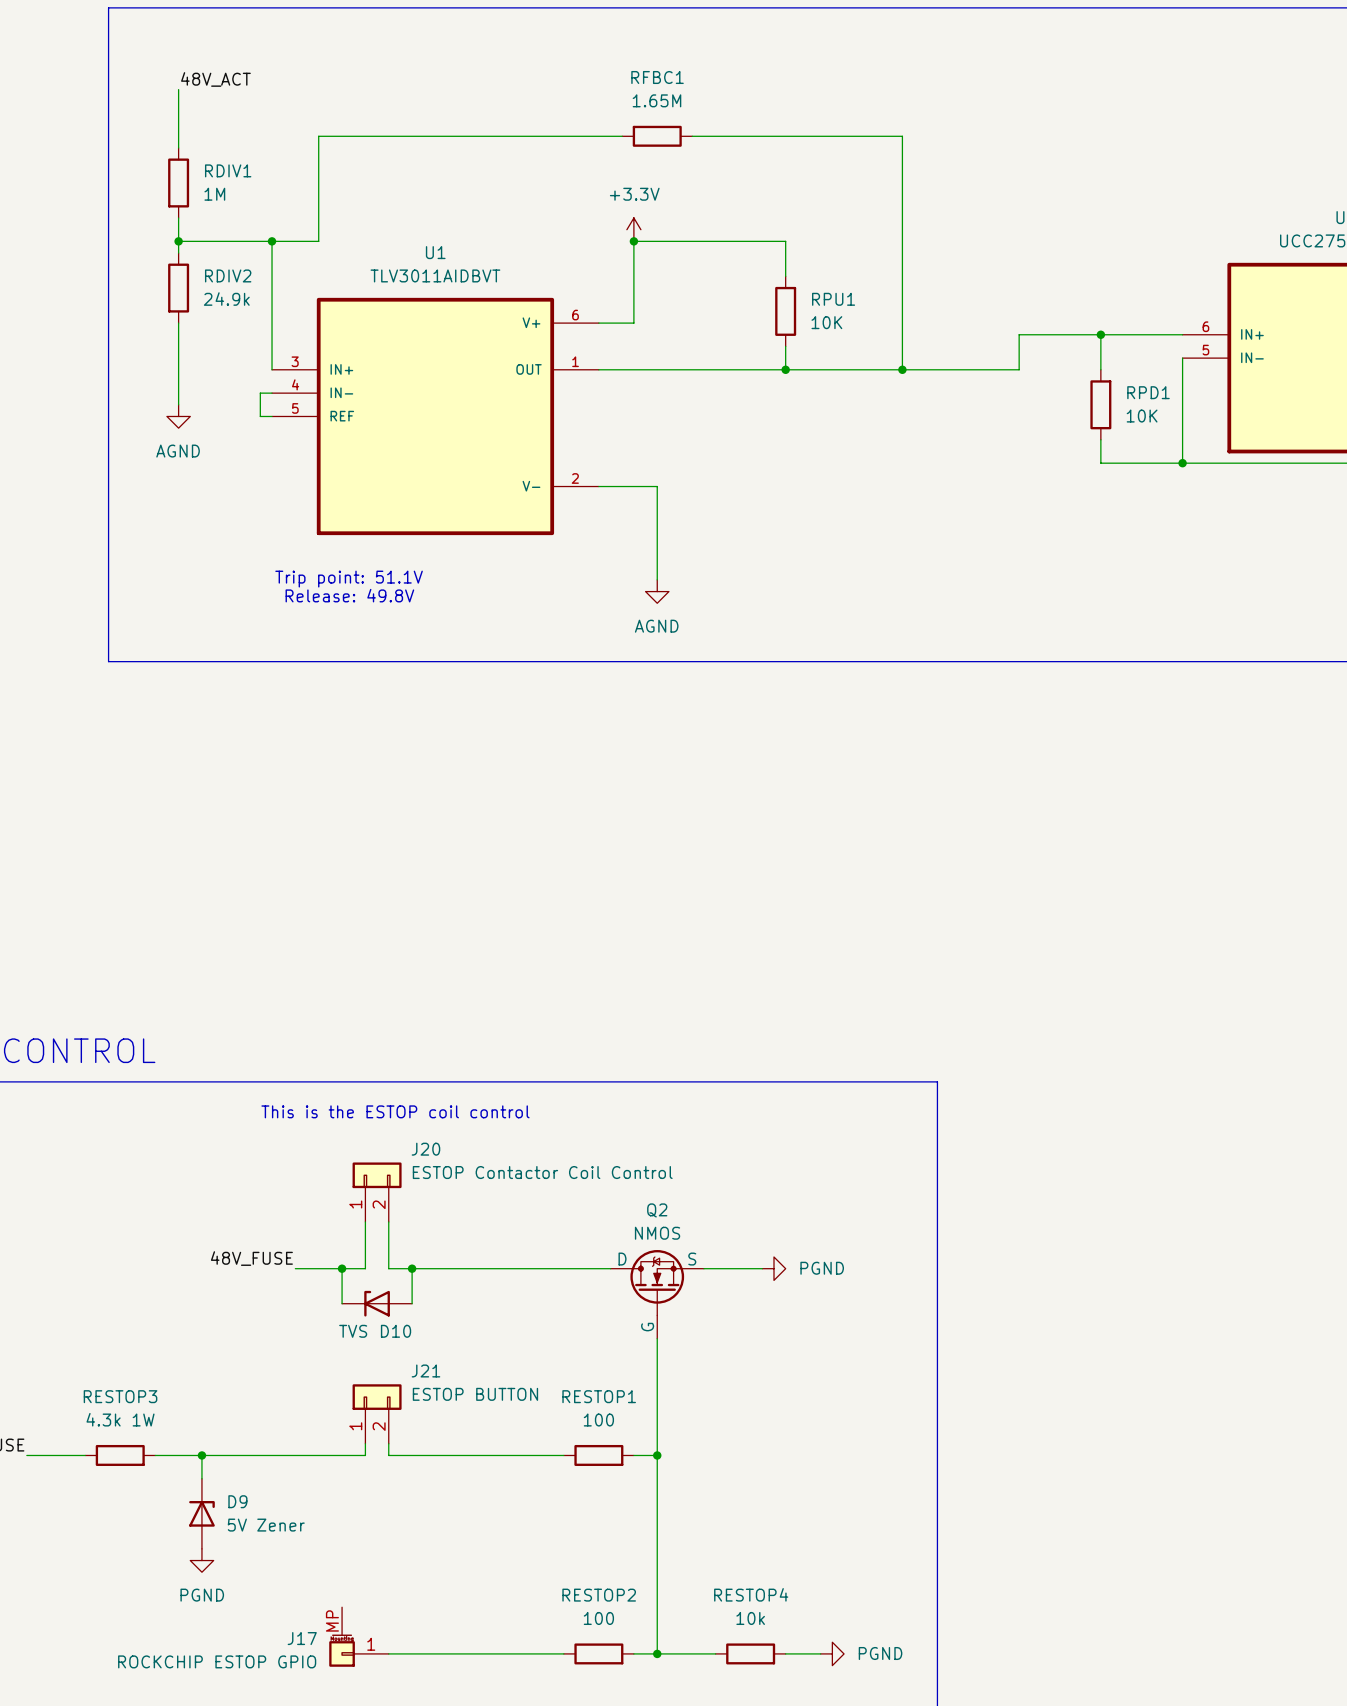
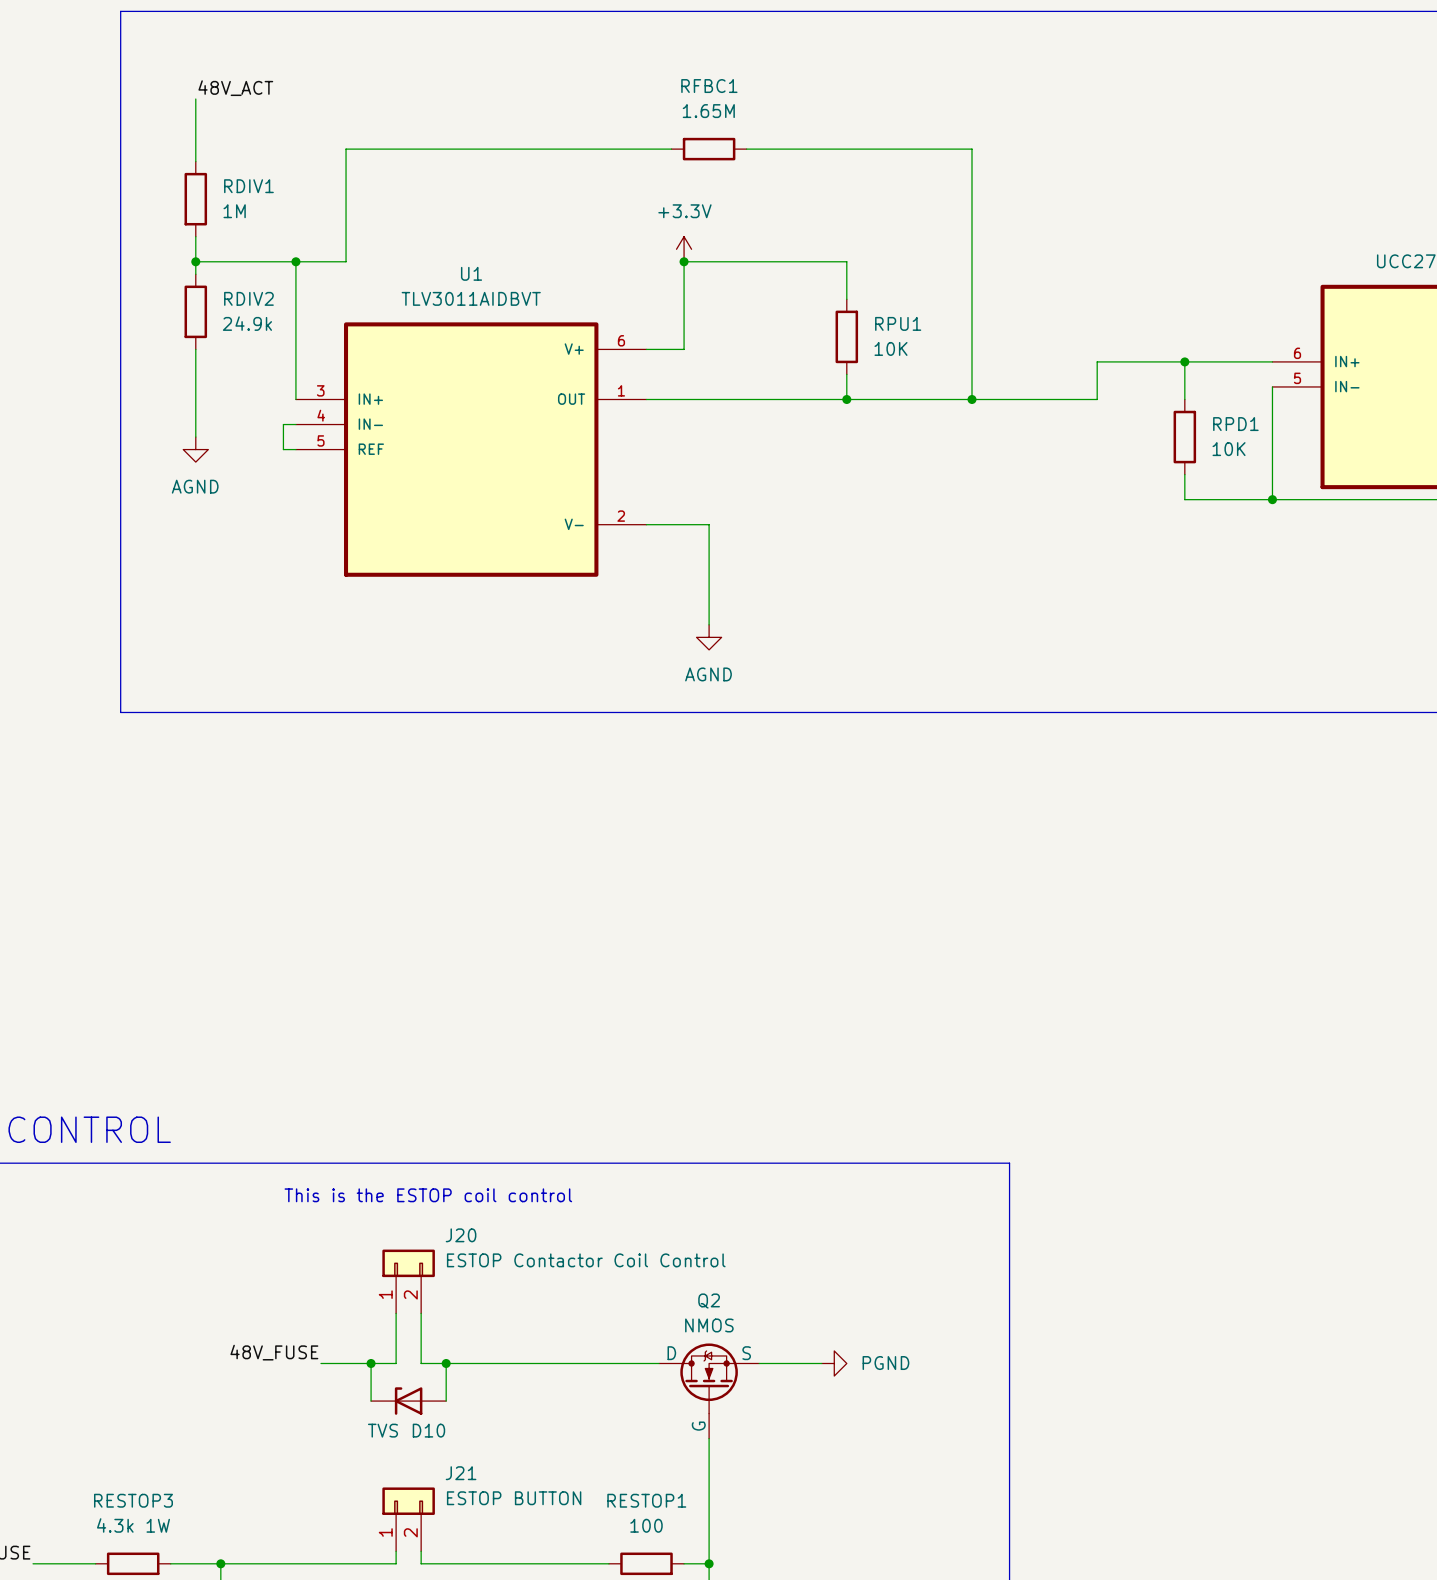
text: Trip point: 51.1V (349, 579) -> none
text: Release: 49.8V (349, 595) -> none

